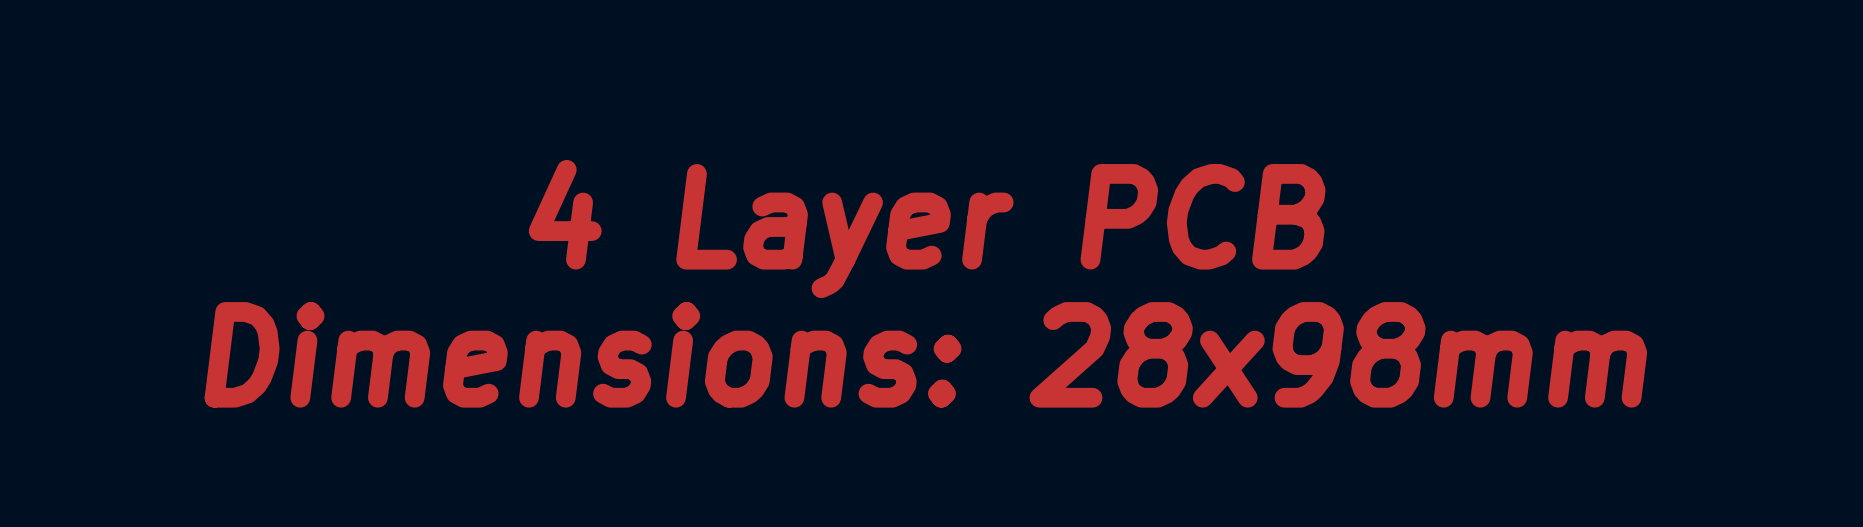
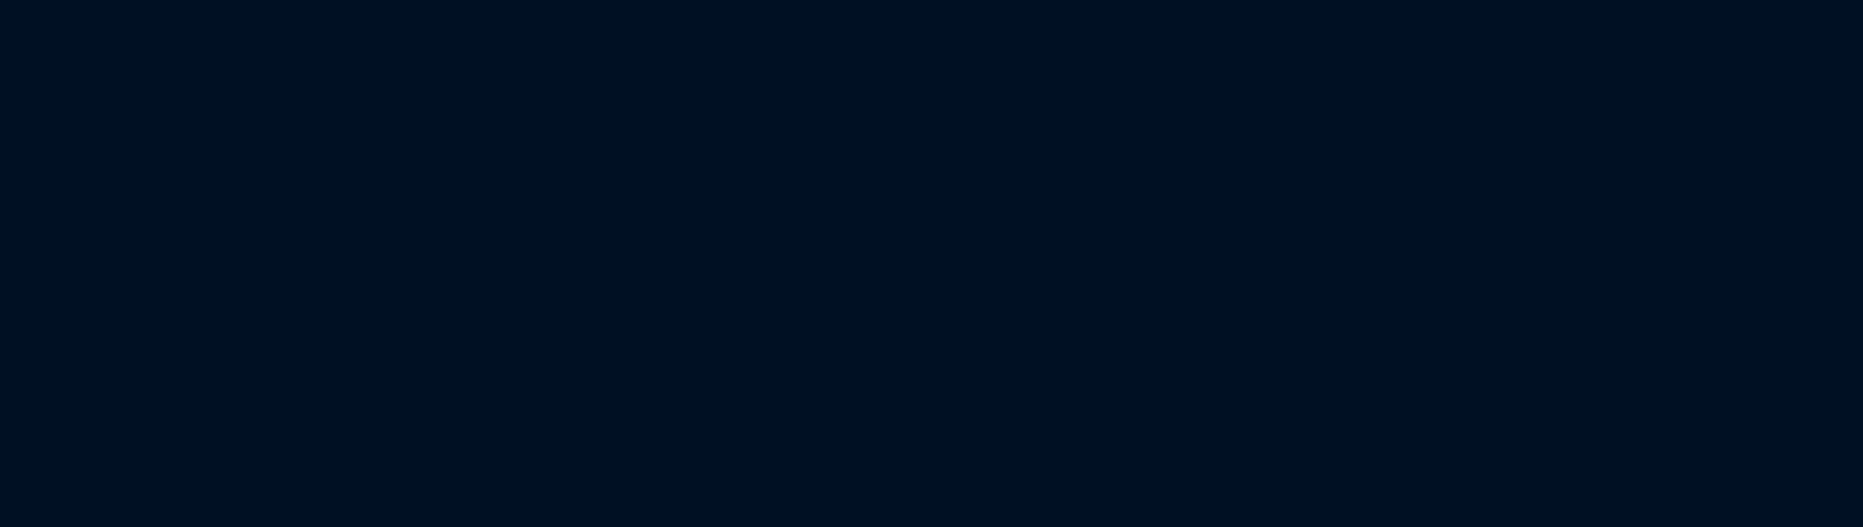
text: 4 Layer PCB (927, 229) -> none
text: Dimensions: 28x98mm (925, 354) -> none

